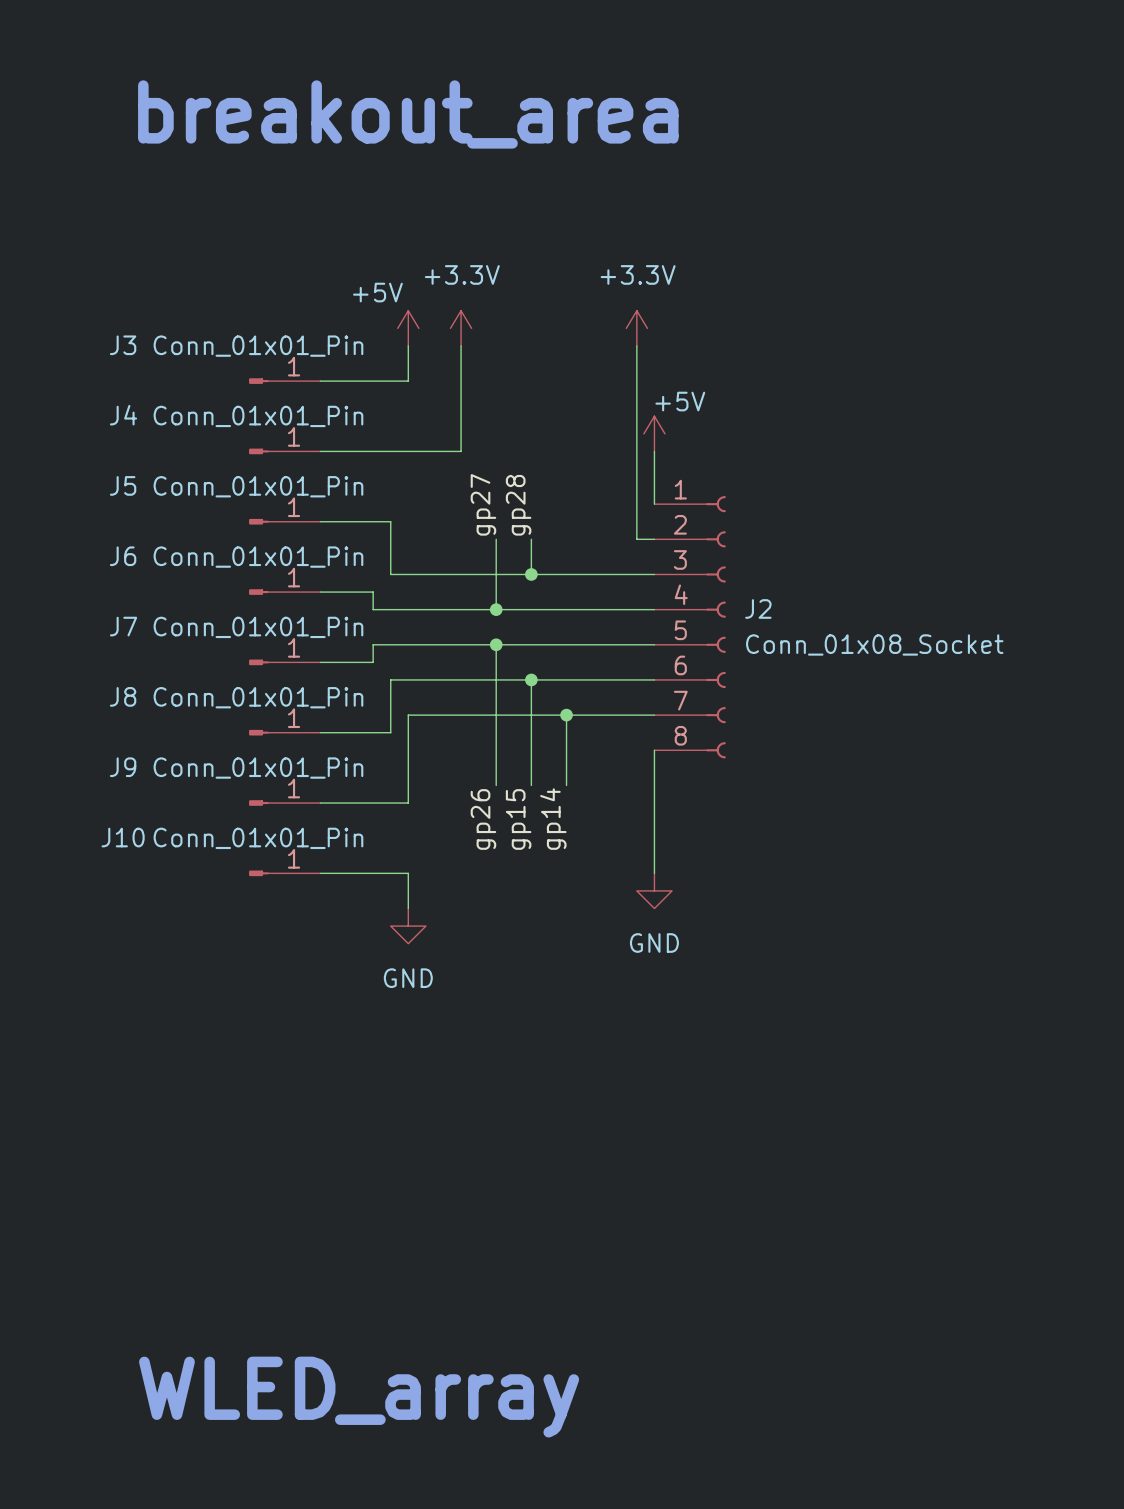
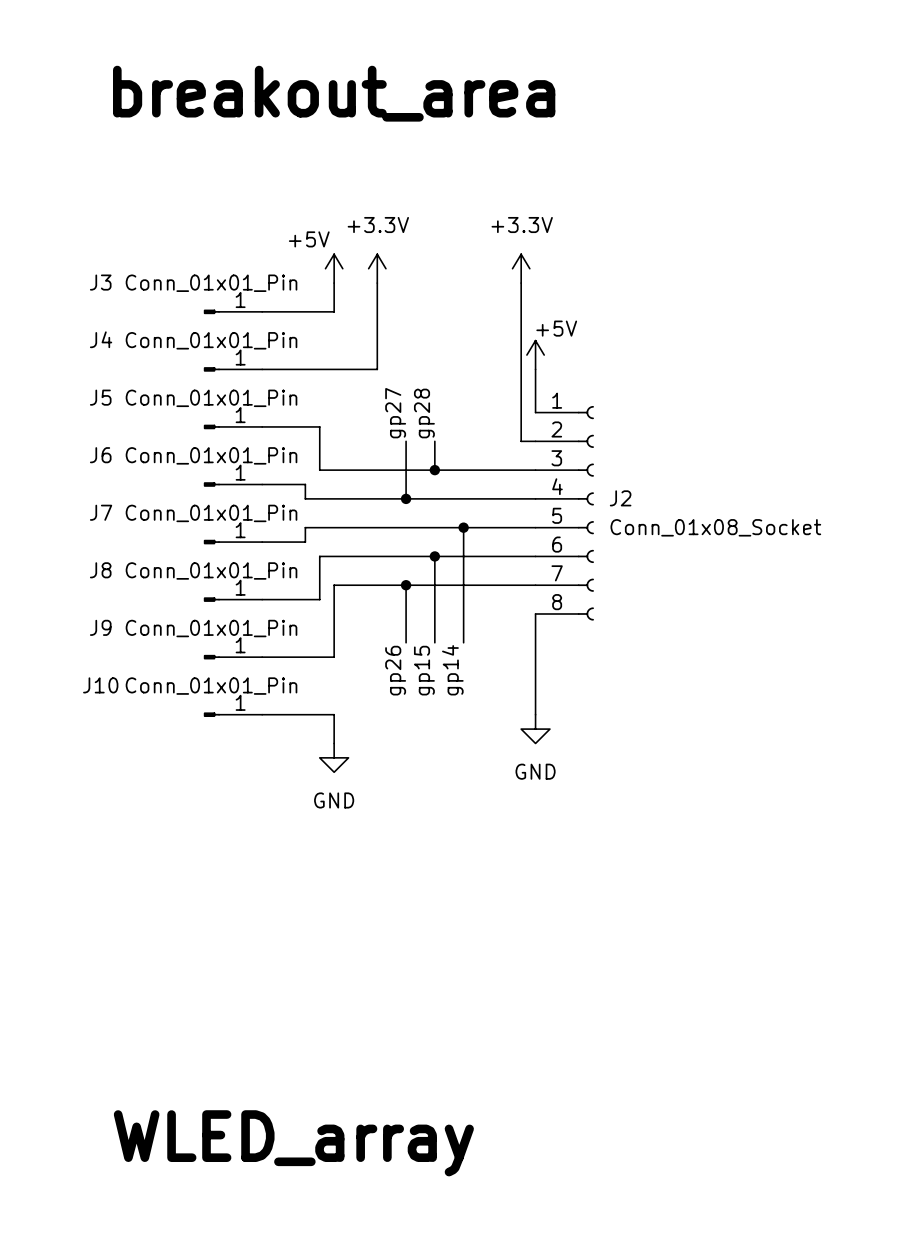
wire: (496, 644) (496, 715) -> (463, 527) (463, 585)
junction: (496, 644) -> none
junction: none -> (463, 527)
junction: none -> (406, 585)
junction: (566, 715) -> none

